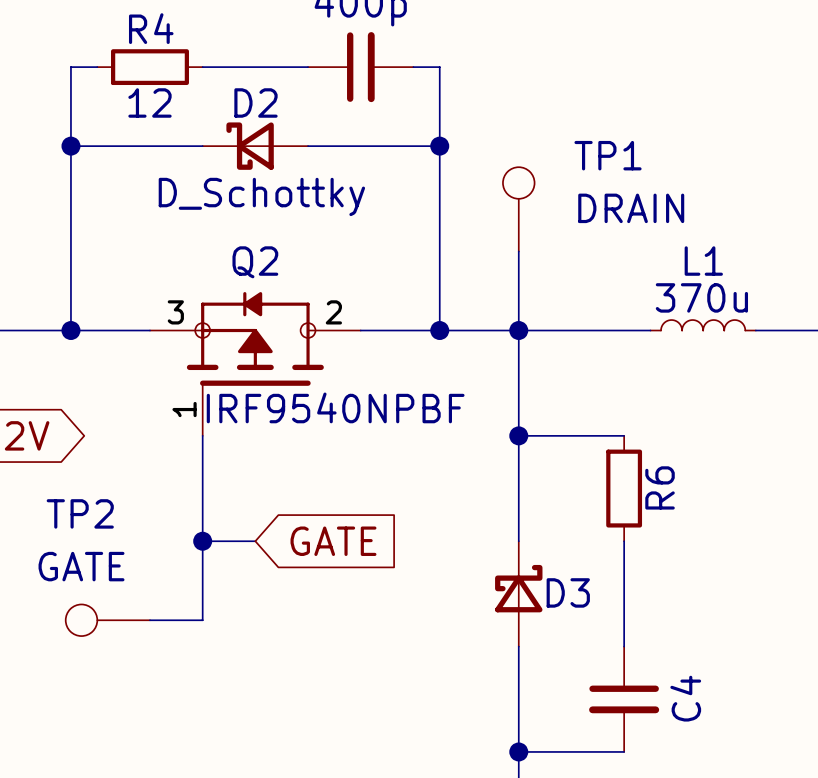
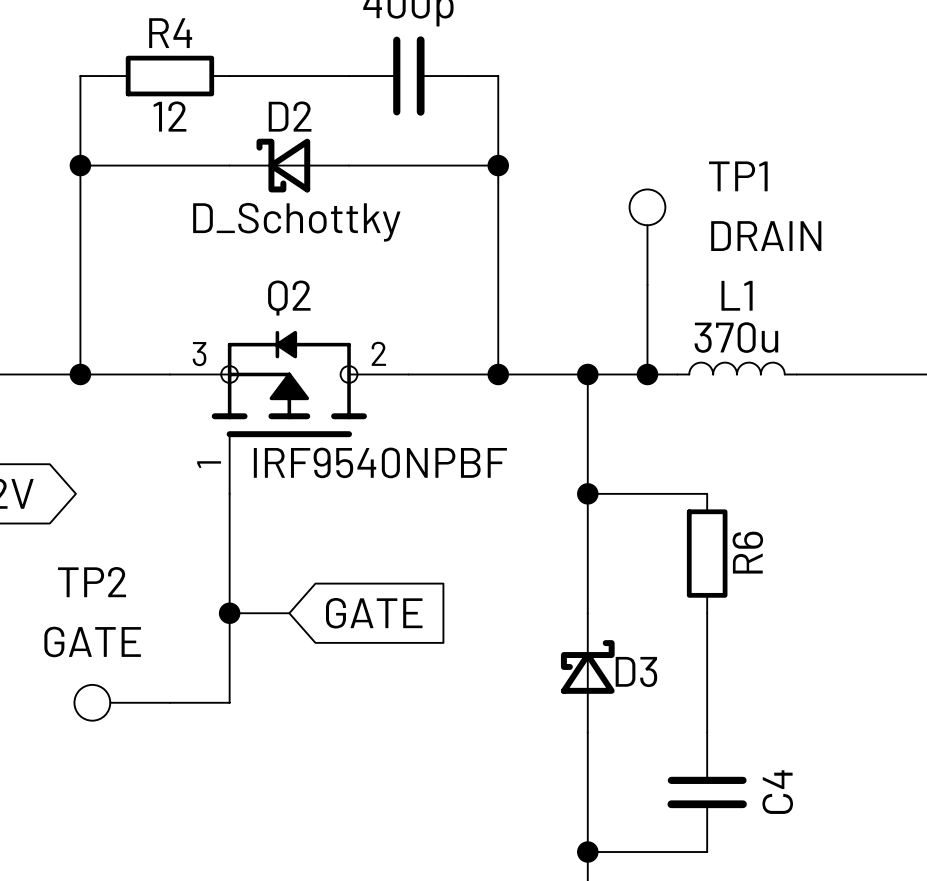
TP1 position: (518, 209) -> (647, 237)
wire: (518, 251) (518, 330) -> (647, 284) (647, 374)
L1 position: (703, 325) -> (737, 368)
junction: none -> (647, 374)
wire: (597, 330) (650, 330) -> (796, 374) (856, 374)

